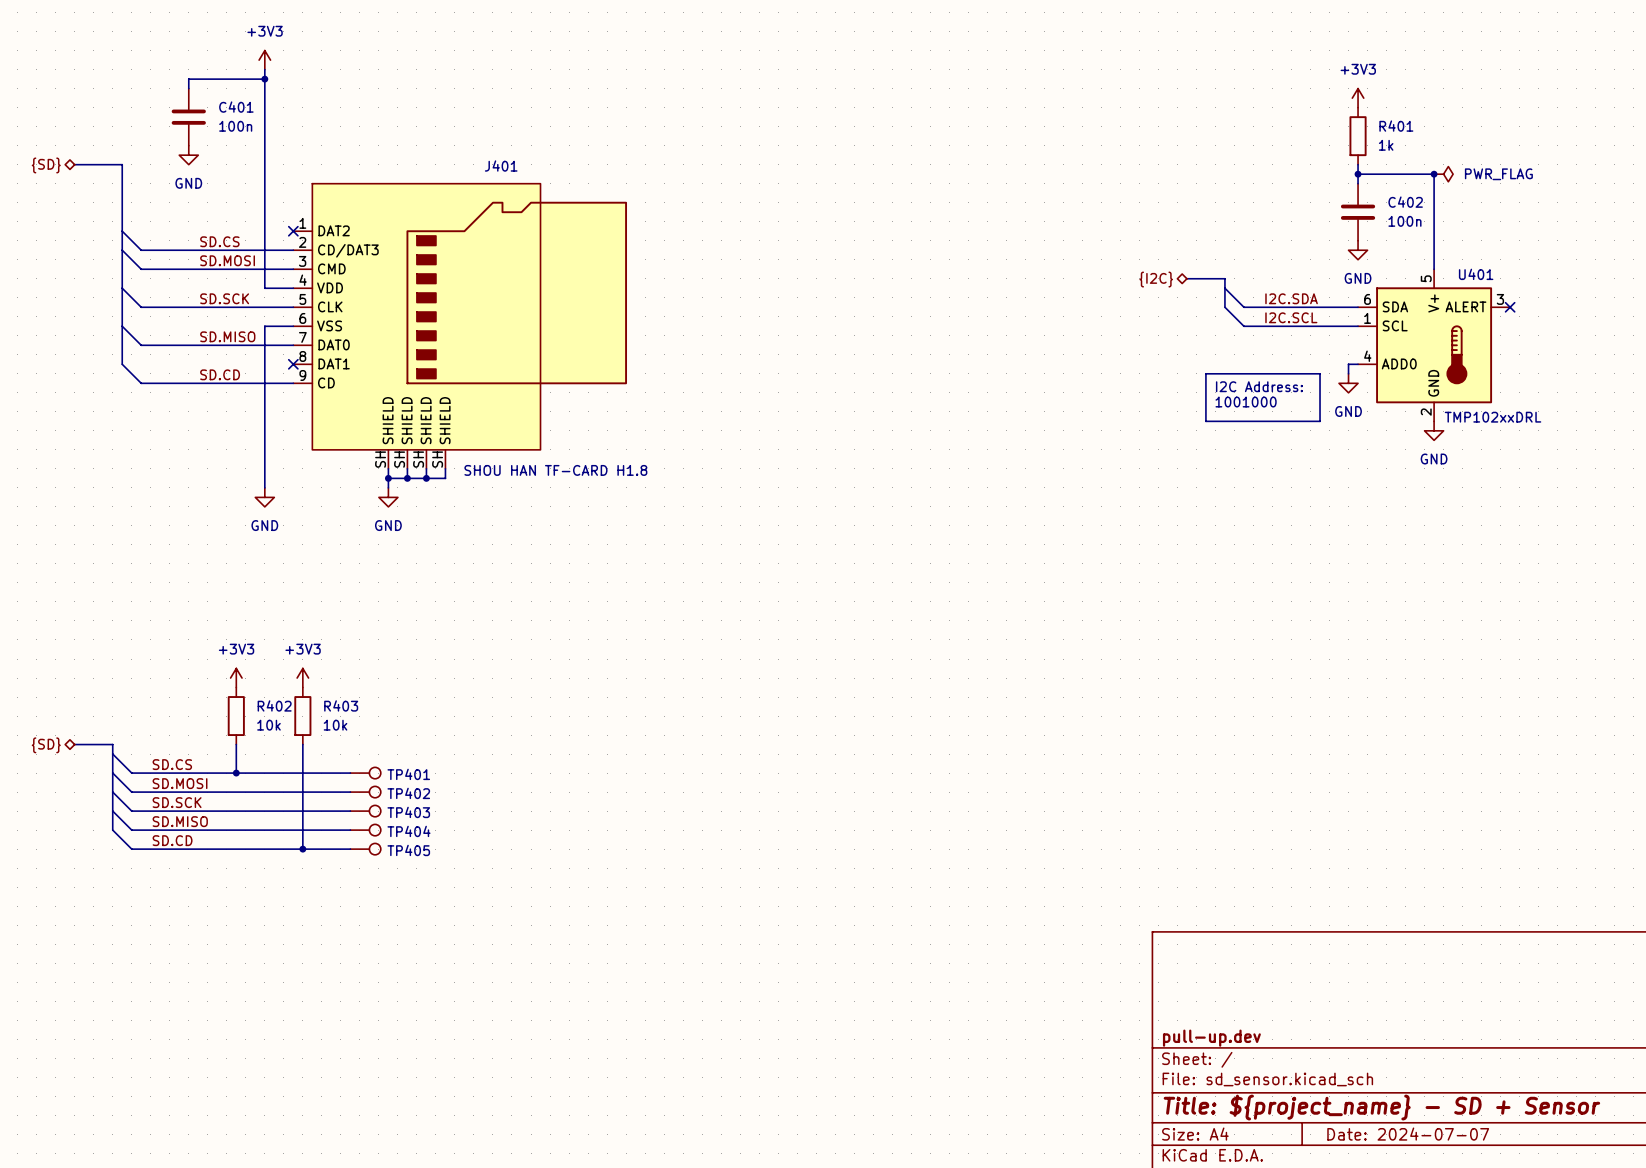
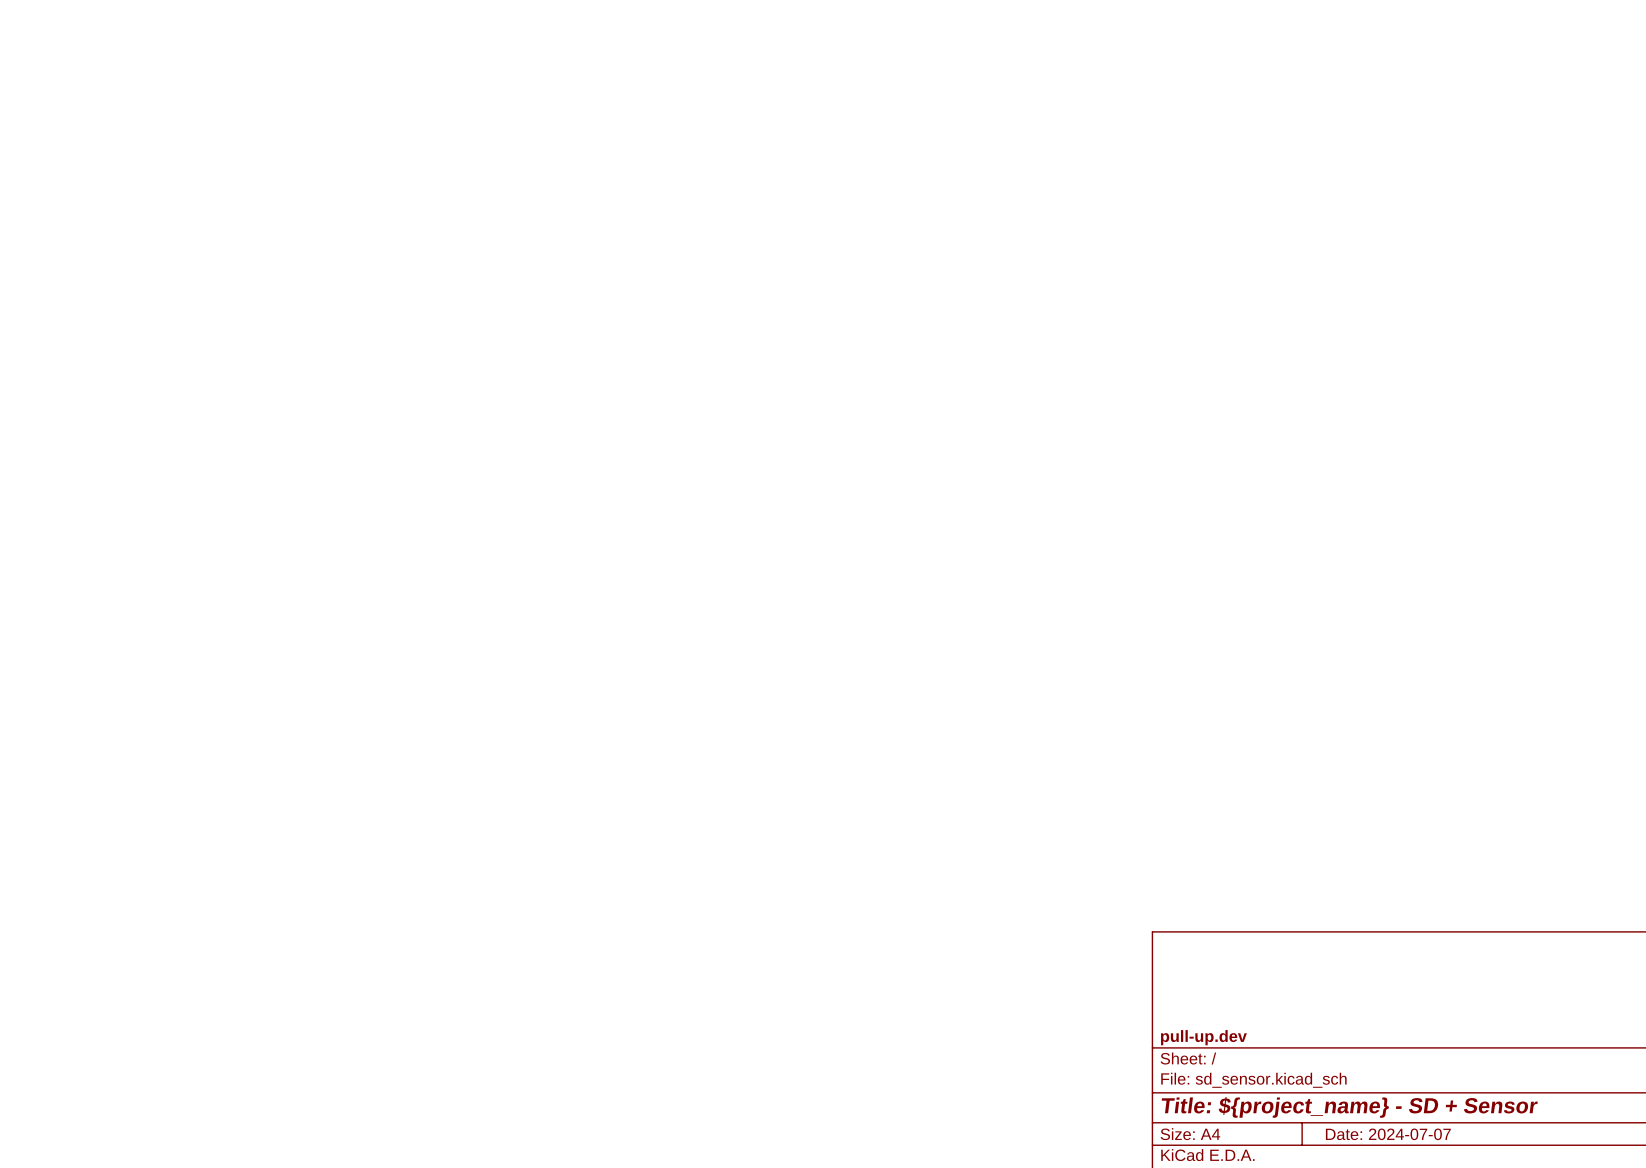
power symbol: +3V3 (264, 60) -> none
wire: (264, 69) (264, 288) (293, 288) -> none
wire: (264, 79) (188, 79) (188, 88) -> none
junction: (264, 79) -> none
power symbol: +3V3 (1358, 98) -> none
C401: 100n (188, 117) -> none
R401: 1k (1358, 136) -> none
power symbol: GND (188, 155) -> none
bus: (74, 164) (122, 164) (122, 364) -> none
wire: (1358, 164) (1358, 183) -> none
hierarchical label: {SD} (46, 165) -> none
wire: (1358, 174) (1434, 174) (1434, 269) -> none
junction: (1358, 174) -> none
junction: (1434, 174) -> none
power symbol: PWR_FLAG (1443, 174) -> none
C402: 100n (1358, 212) -> none
wire: (122, 231) (141, 250) (293, 250) -> none
no-connect mark: (293, 231) -> none
label: SD.CS (219, 241) -> none
wire: (122, 250) (141, 269) (293, 269) -> none
power symbol: GND (1358, 250) -> none
label: SD.MOSI (227, 260) -> none
bus: (1186, 278) (1224, 278) (1224, 307) -> none
hierarchical label: {I2C} (1156, 279) -> none
wire: (122, 288) (141, 307) (293, 307) -> none
wire: (1224, 288) (1243, 307) (1358, 307) -> none
label: SD.SCK (224, 298) -> none
label: I2C.SDA (1291, 298) -> none
wire: (1224, 307) (1243, 326) (1358, 326) -> none
no-connect mark: (1510, 307) -> none
label: I2C.SCL (1291, 317) -> none
wire: (122, 326) (141, 345) (293, 345) -> none
wire: (293, 326) (264, 326) (264, 487) -> none
J401: SHOU HAN TF-CARD H1.8 (460, 326) -> none
label: SD.MISO (227, 336) -> none
U401: TMP102xxDRL (1434, 345) -> none
wire: (122, 364) (141, 383) (293, 383) -> none
no-connect mark: (293, 364) -> none
wire: (1358, 364) (1348, 364) (1348, 373) -> none
line: (1205, 373) (1320, 373) (1320, 421) (1205, 421) (1205, 373) -> none
label: SD.CD (220, 374) -> none
power symbol: GND (1348, 383) -> none
text: I2C Address: (1259, 386) -> none
text: 1001000 (1246, 402) -> none
power symbol: GND (1434, 430) -> none
wire: (388, 468) (388, 487) -> none
wire: (407, 468) (407, 478) -> none
wire: (426, 468) (426, 478) -> none
wire: (445, 468) (445, 478) (388, 478) -> none
junction: (388, 478) -> none
junction: (407, 478) -> none
junction: (426, 478) -> none
power symbol: GND (264, 497) -> none
power symbol: GND (388, 497) -> none
power symbol: +3V3 (236, 678) -> none
power symbol: +3V3 (302, 678) -> none
R402: 10k (236, 716) -> none
R403: 10k (302, 716) -> none
bus: (74, 744) (112, 744) (112, 830) -> none
wire: (236, 744) (236, 773) -> none
wire: (302, 744) (302, 849) -> none
hierarchical label: {SD} (46, 745) -> none
wire: (112, 754) (131, 773) (350, 773) -> none
label: SD.CS (172, 764) -> none
wire: (112, 773) (131, 792) (350, 792) -> none
junction: (236, 773) -> none
TP401: (365, 773) -> none
label: SD.MOSI (180, 783) -> none
wire: (112, 792) (131, 811) (350, 811) -> none
TP402: (365, 792) -> none
label: SD.SCK (177, 802) -> none
wire: (112, 811) (131, 830) (350, 830) -> none
TP403: (365, 811) -> none
label: SD.MISO (180, 821) -> none
wire: (112, 830) (131, 849) (350, 849) -> none
TP404: (365, 830) -> none
label: SD.CD (172, 840) -> none
junction: (302, 849) -> none
TP405: (365, 849) -> none

